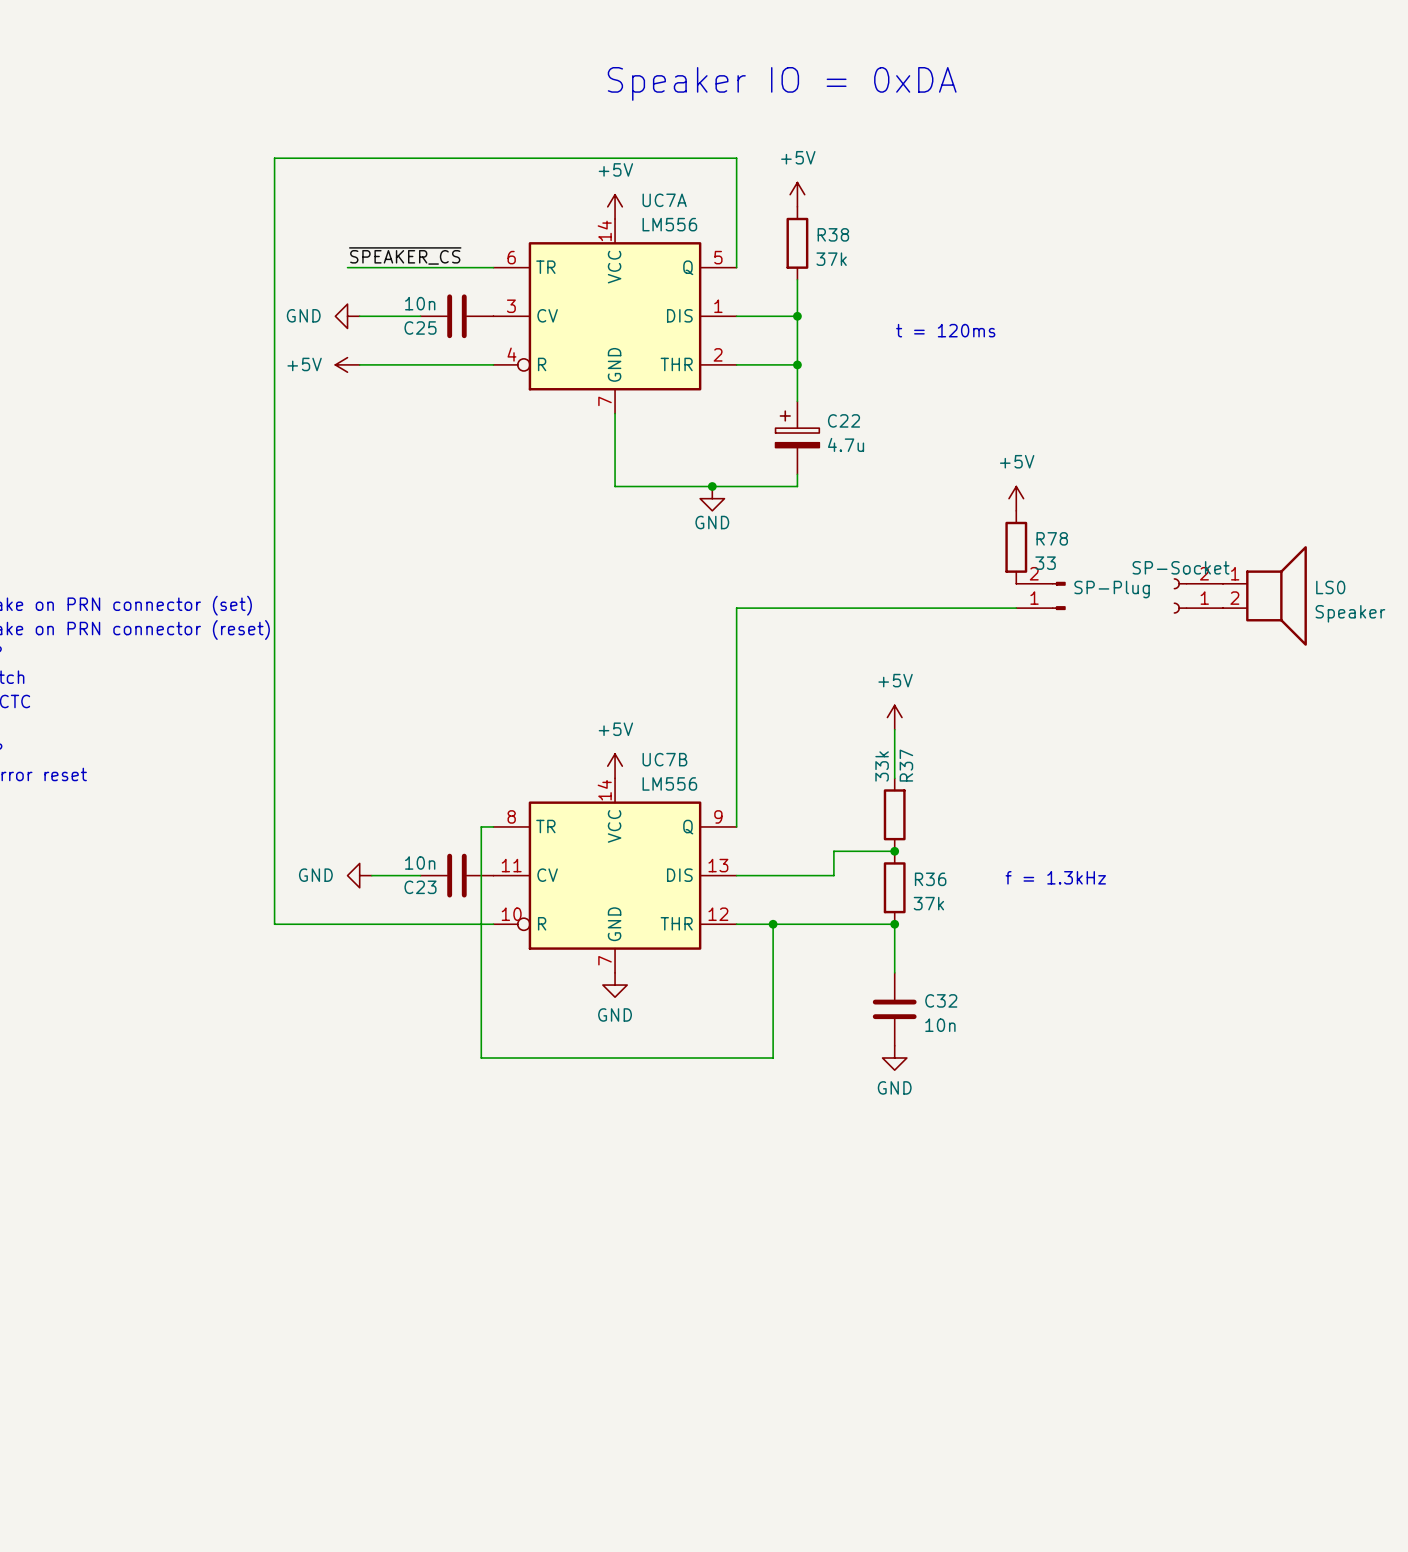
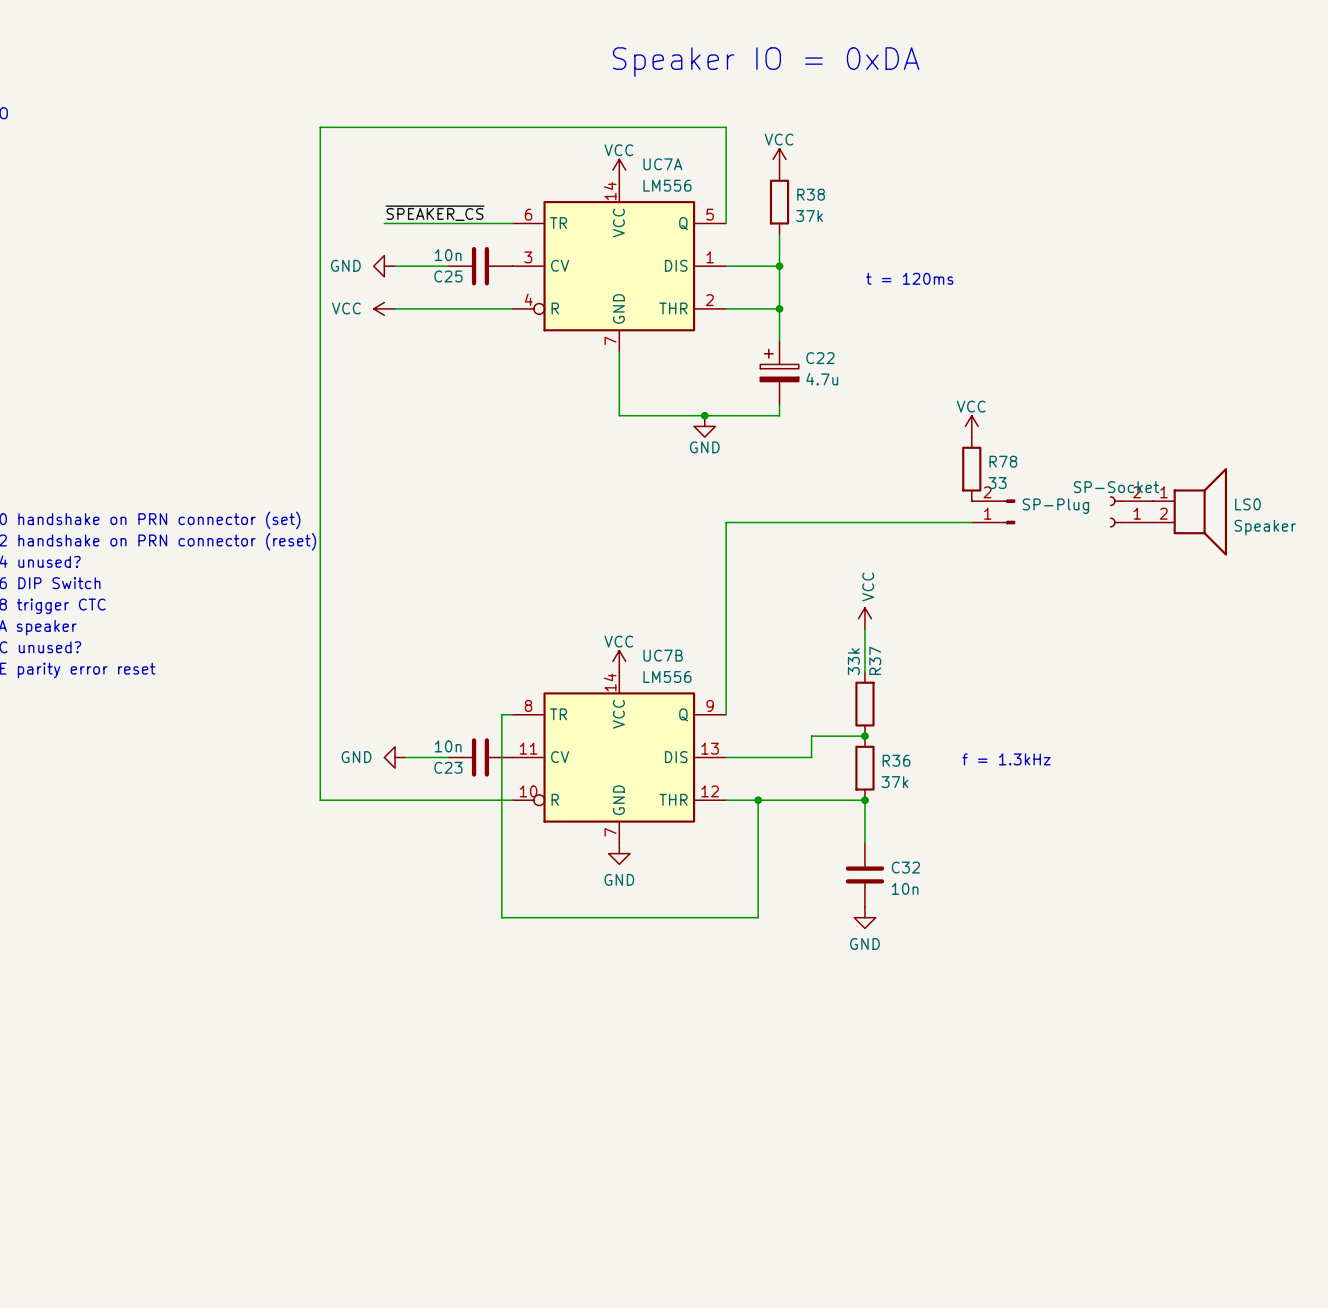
power symbol: +5V (797, 194) -> VCC (779, 159)
power symbol: +5V (615, 206) -> VCC (619, 170)
power symbol: +5V (347, 364) -> VCC (384, 308)
power symbol: +5V (1016, 498) -> VCC (971, 426)
power symbol: +5V (894, 717) -> VCC (864, 618)
power symbol: +5V (615, 766) -> VCC (619, 661)

